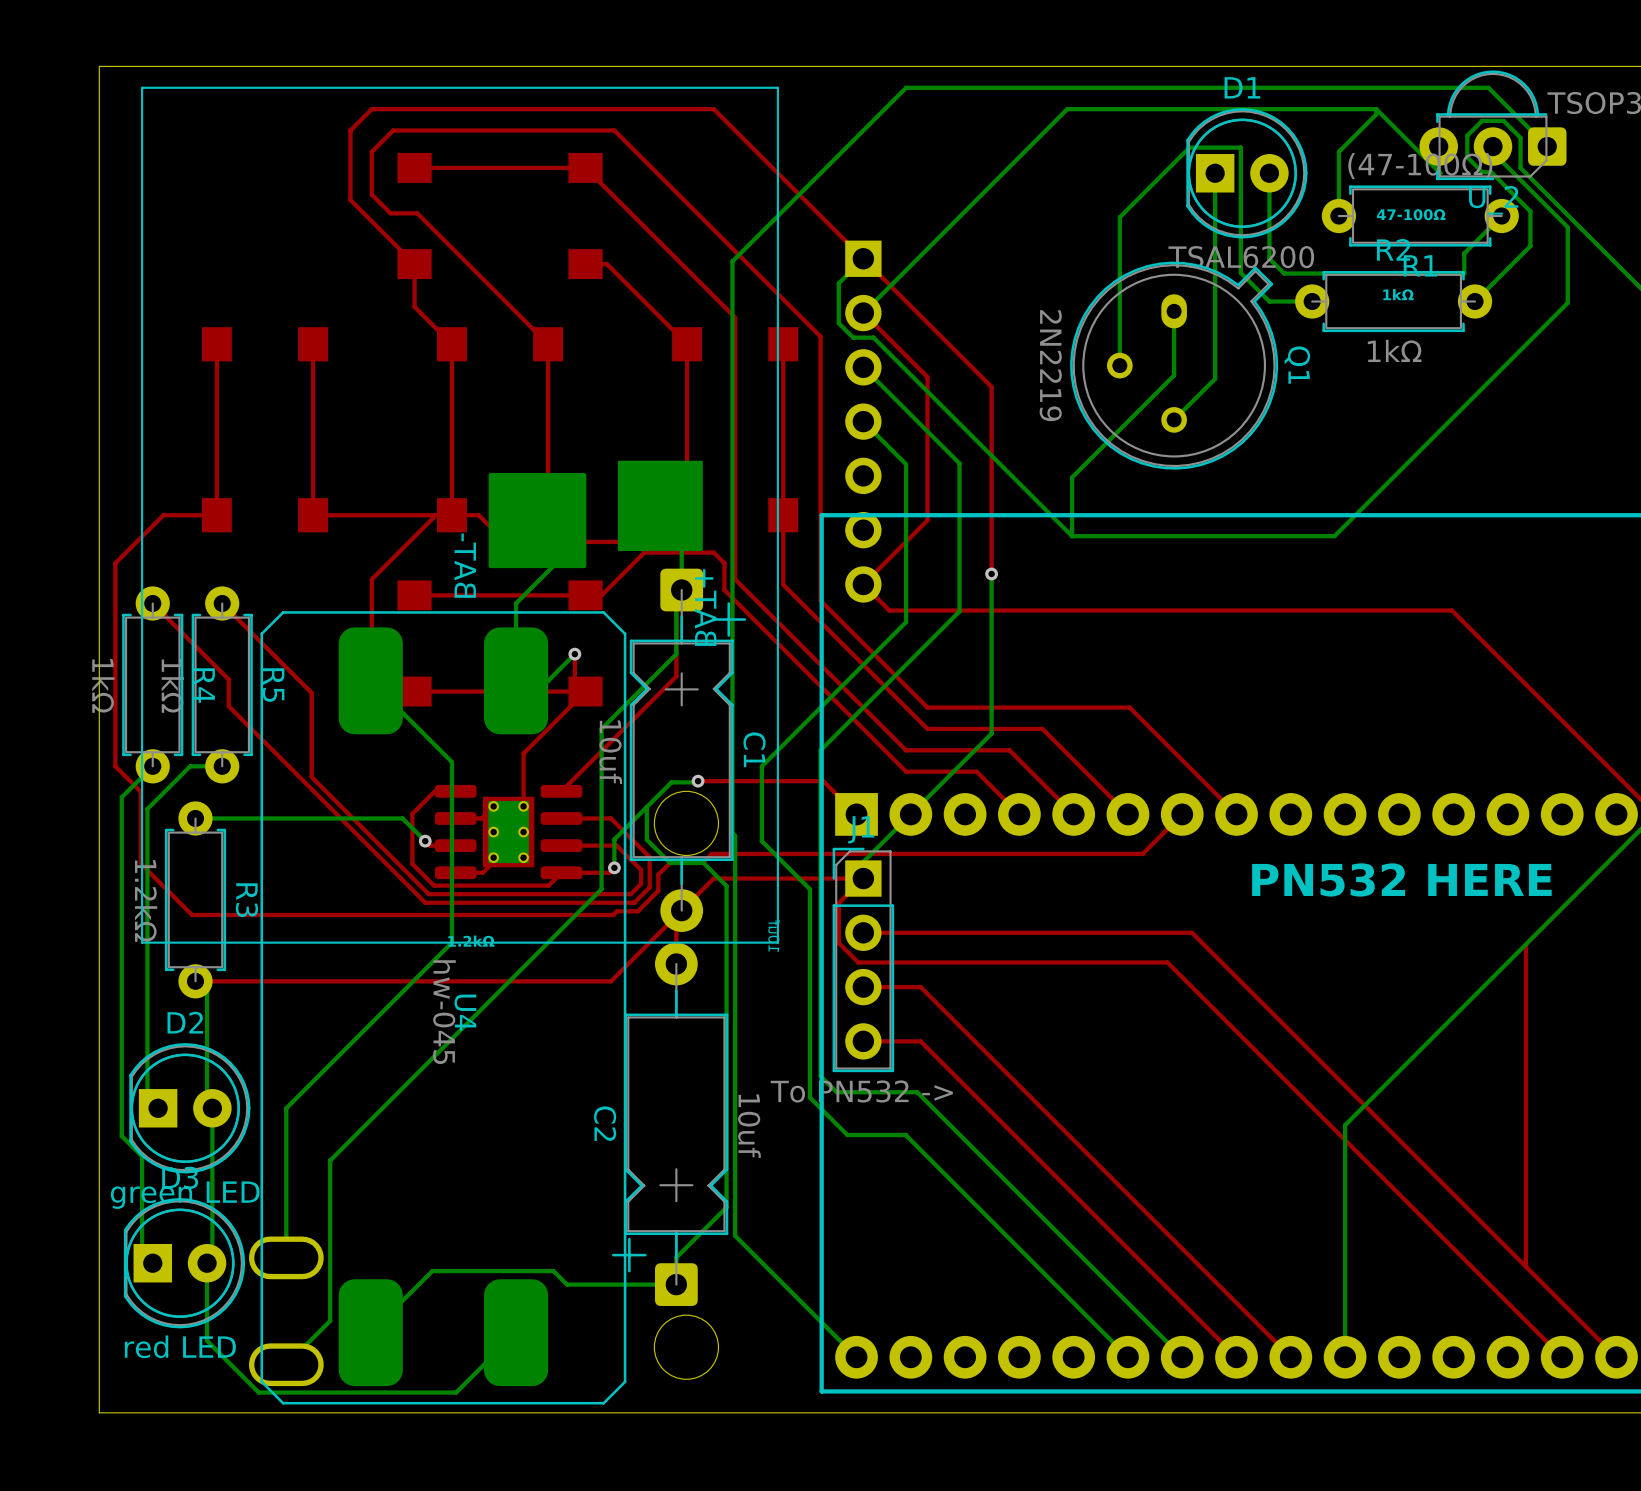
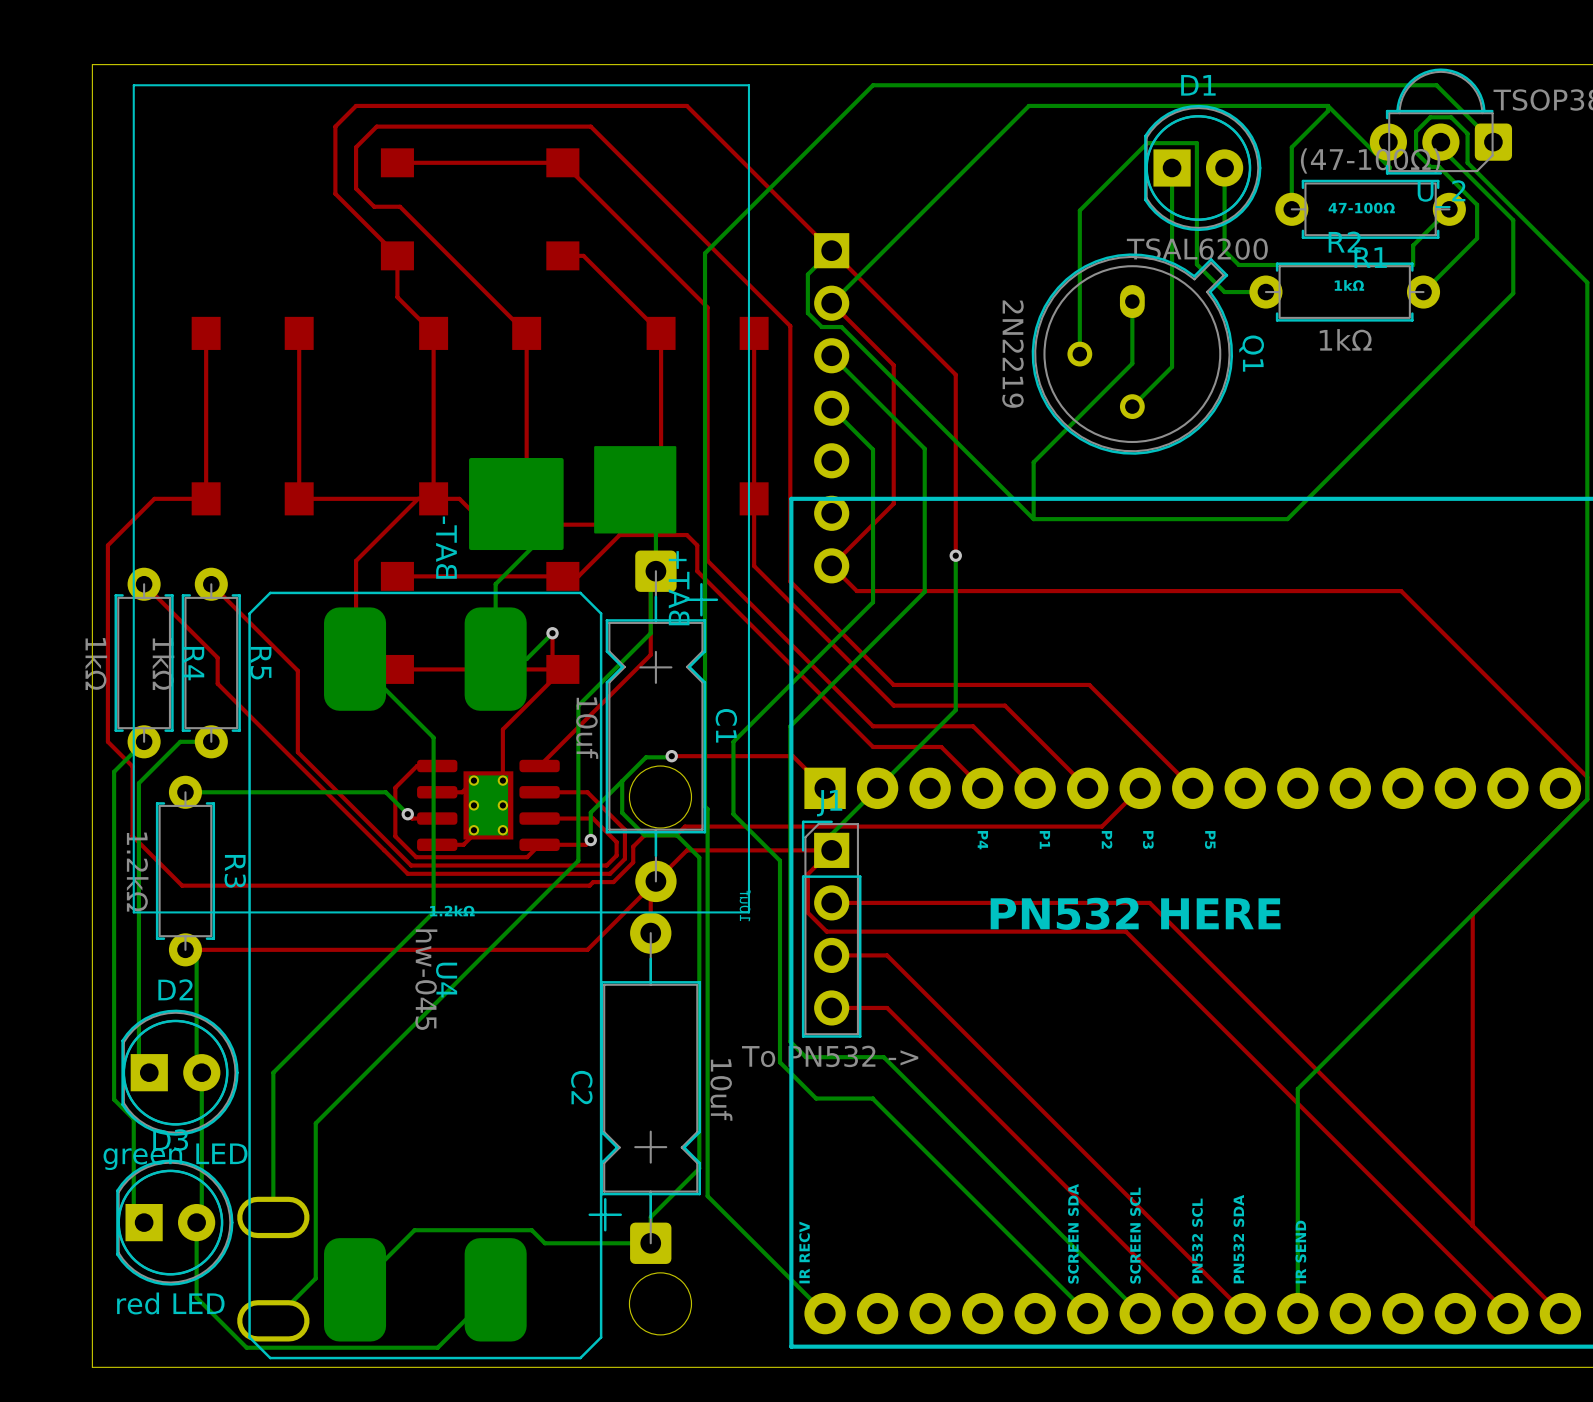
text: none -> P4 (982, 840)
text: none -> P1 (1044, 840)
text: none -> P2 (1107, 839)
text: none -> P3 (1148, 839)
text: none -> P5 (1210, 839)
text position: PN532 HERE (1401, 879) -> PN532 HERE (1135, 913)
text: none -> SCREEN SDA (1073, 1233)
text: none -> SCREEN SCL (1135, 1235)
text: none -> PN532 SDA (1238, 1239)
text: none -> PN532 SCL (1197, 1240)
text: none -> IR SEND (1300, 1252)
text: none -> IR RECV (804, 1252)

